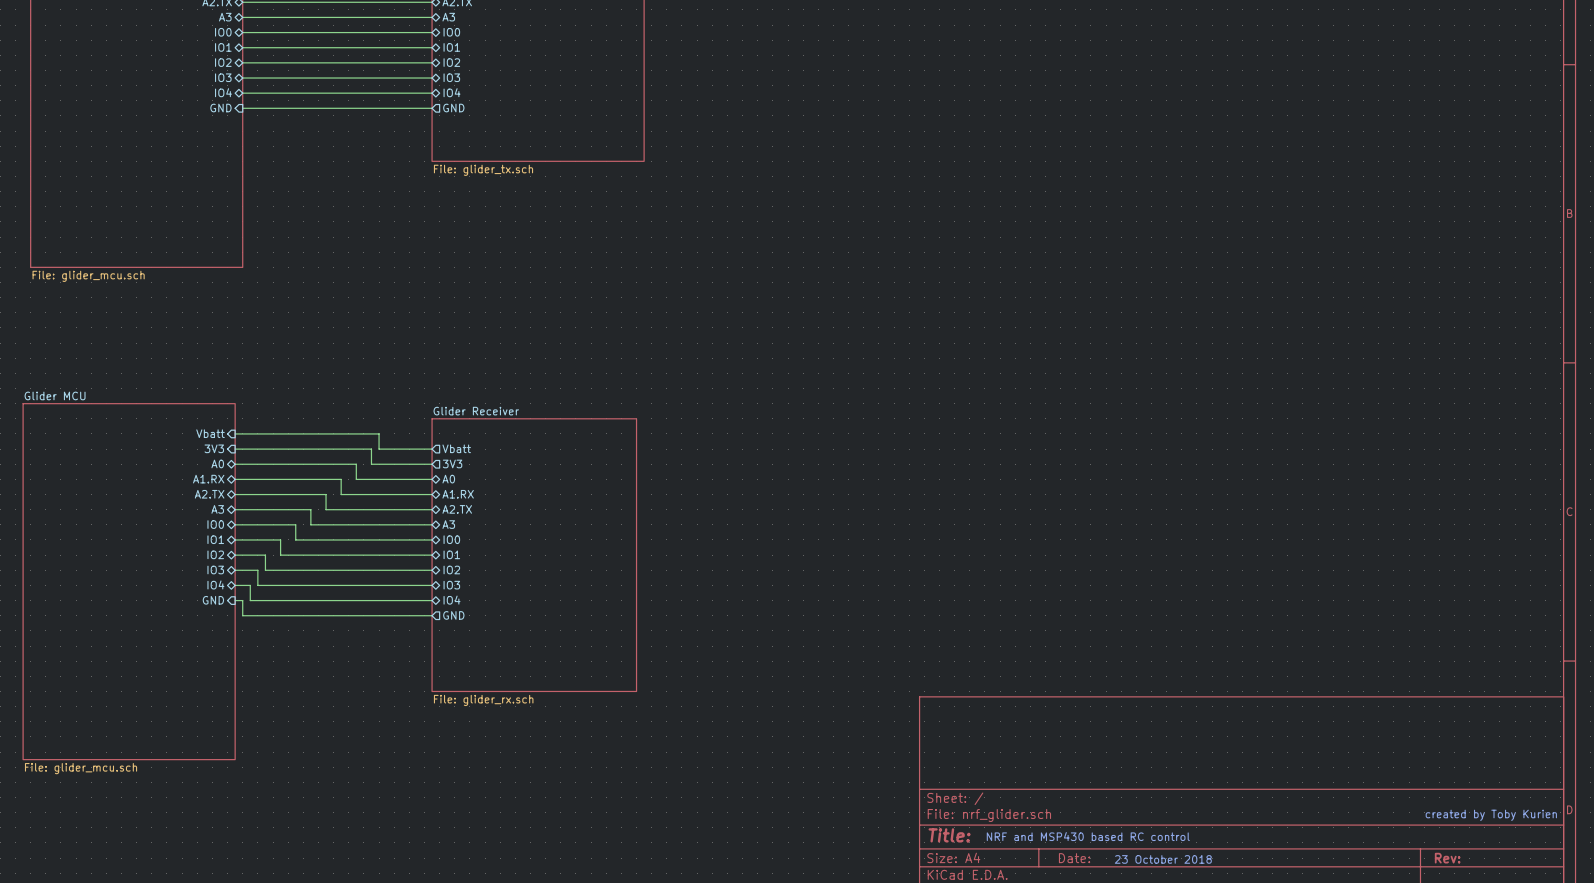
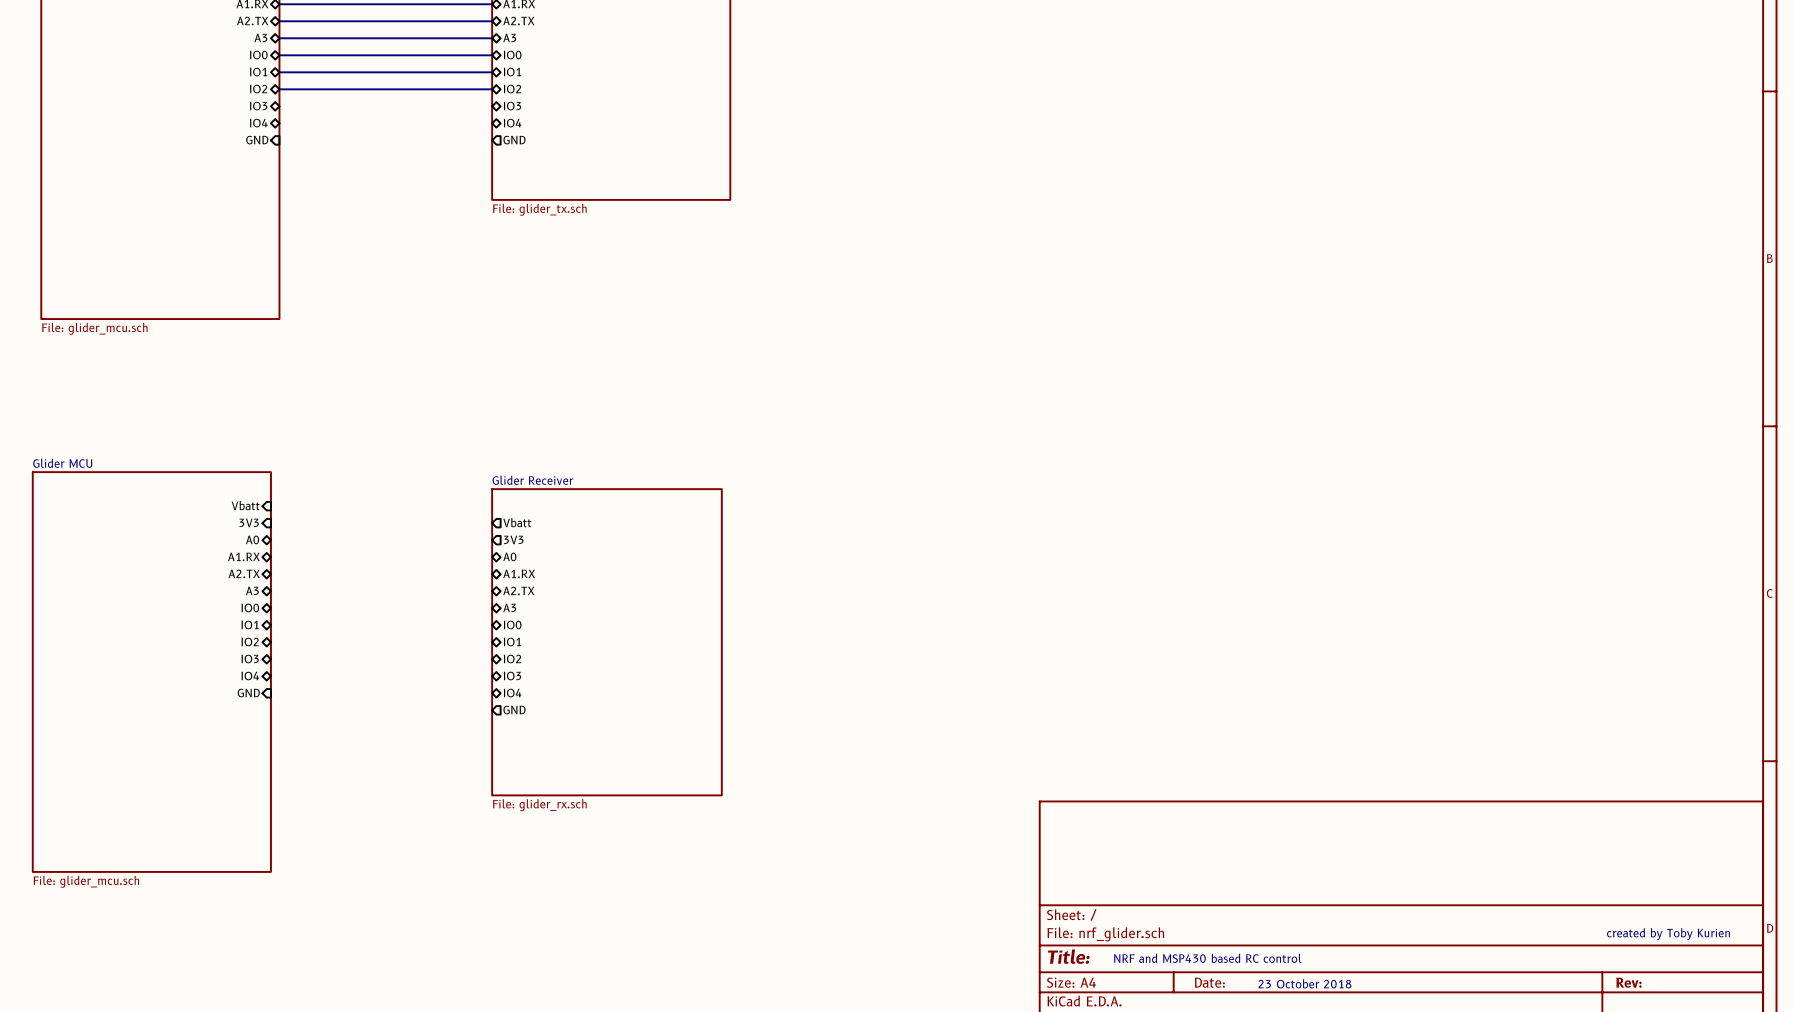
wire: (242, 78) (432, 78) -> none
wire: (242, 93) (432, 93) -> none
wire: (242, 108) (432, 108) -> none
wire: (235, 433) (379, 433) (379, 449) (432, 449) -> none
wire: (235, 449) (371, 449) (371, 464) (432, 464) -> none
wire: (235, 464) (356, 464) (356, 479) (432, 479) -> none
wire: (235, 479) (341, 479) (341, 494) (432, 494) -> none
wire: (235, 494) (326, 494) (326, 509) (432, 509) -> none
wire: (235, 509) (310, 509) (310, 524) (432, 524) -> none
wire: (235, 524) (295, 524) (295, 539) (432, 539) -> none
wire: (235, 539) (280, 539) (280, 555) (432, 555) -> none
wire: (235, 555) (265, 555) (265, 570) (432, 570) -> none
wire: (235, 570) (257, 570) (257, 585) (432, 585) -> none
wire: (235, 585) (250, 585) (250, 600) (432, 600) -> none
wire: (235, 600) (242, 600) (242, 615) (432, 615) -> none

